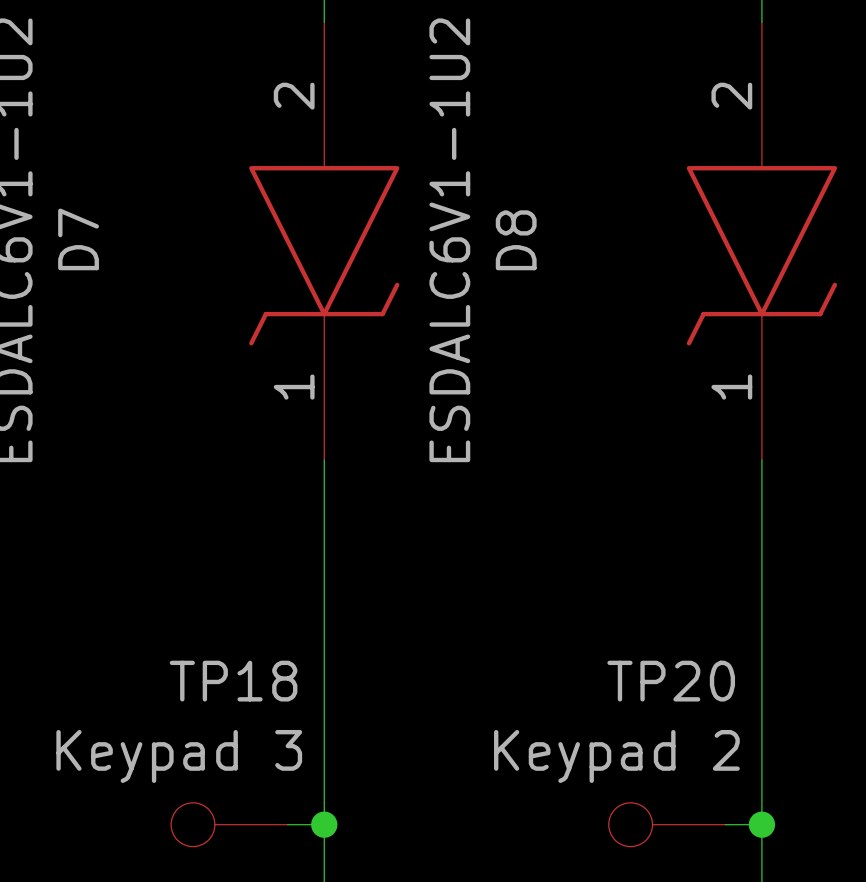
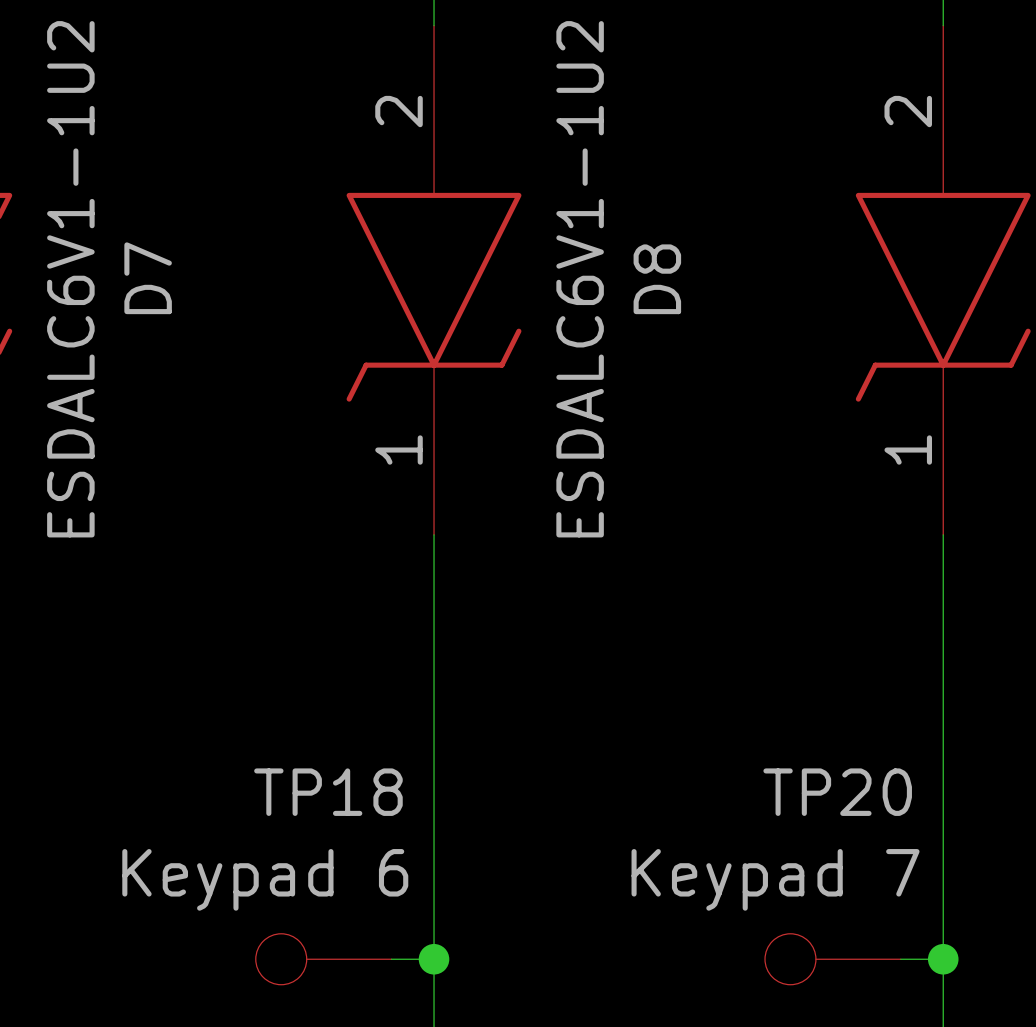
TP18 value: Keypad 3 (179, 756) -> Keypad 6 (265, 879)
TP20 value: Keypad 2 (616, 756) -> Keypad 7 (775, 879)

